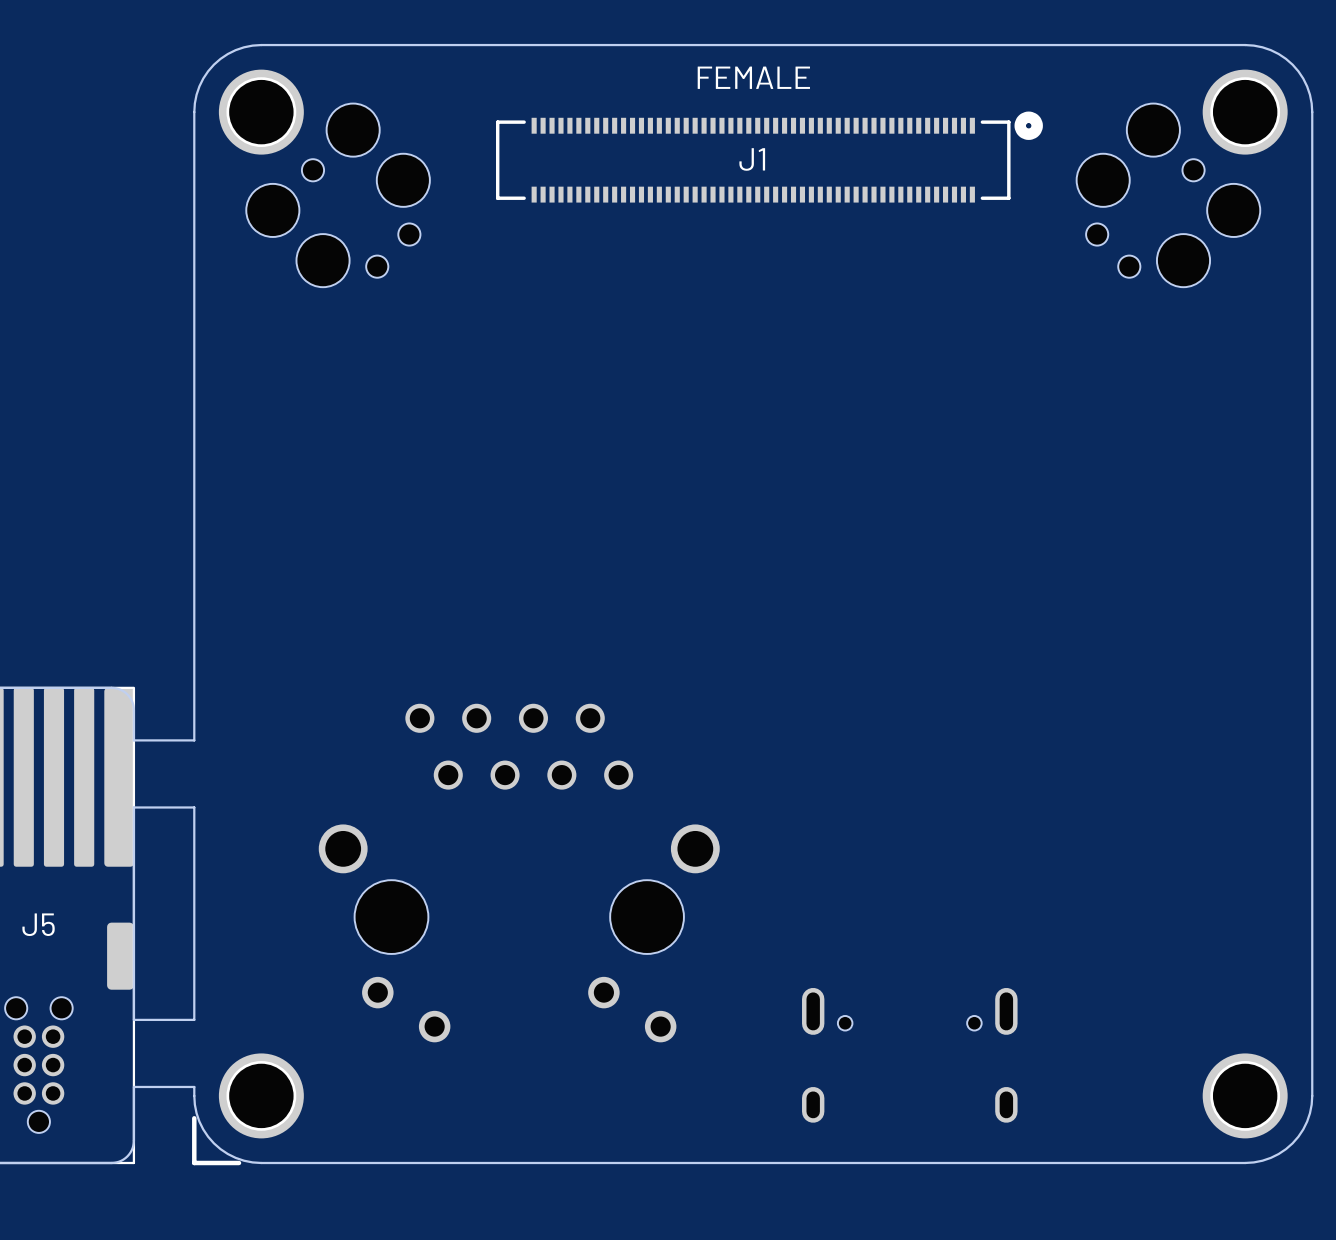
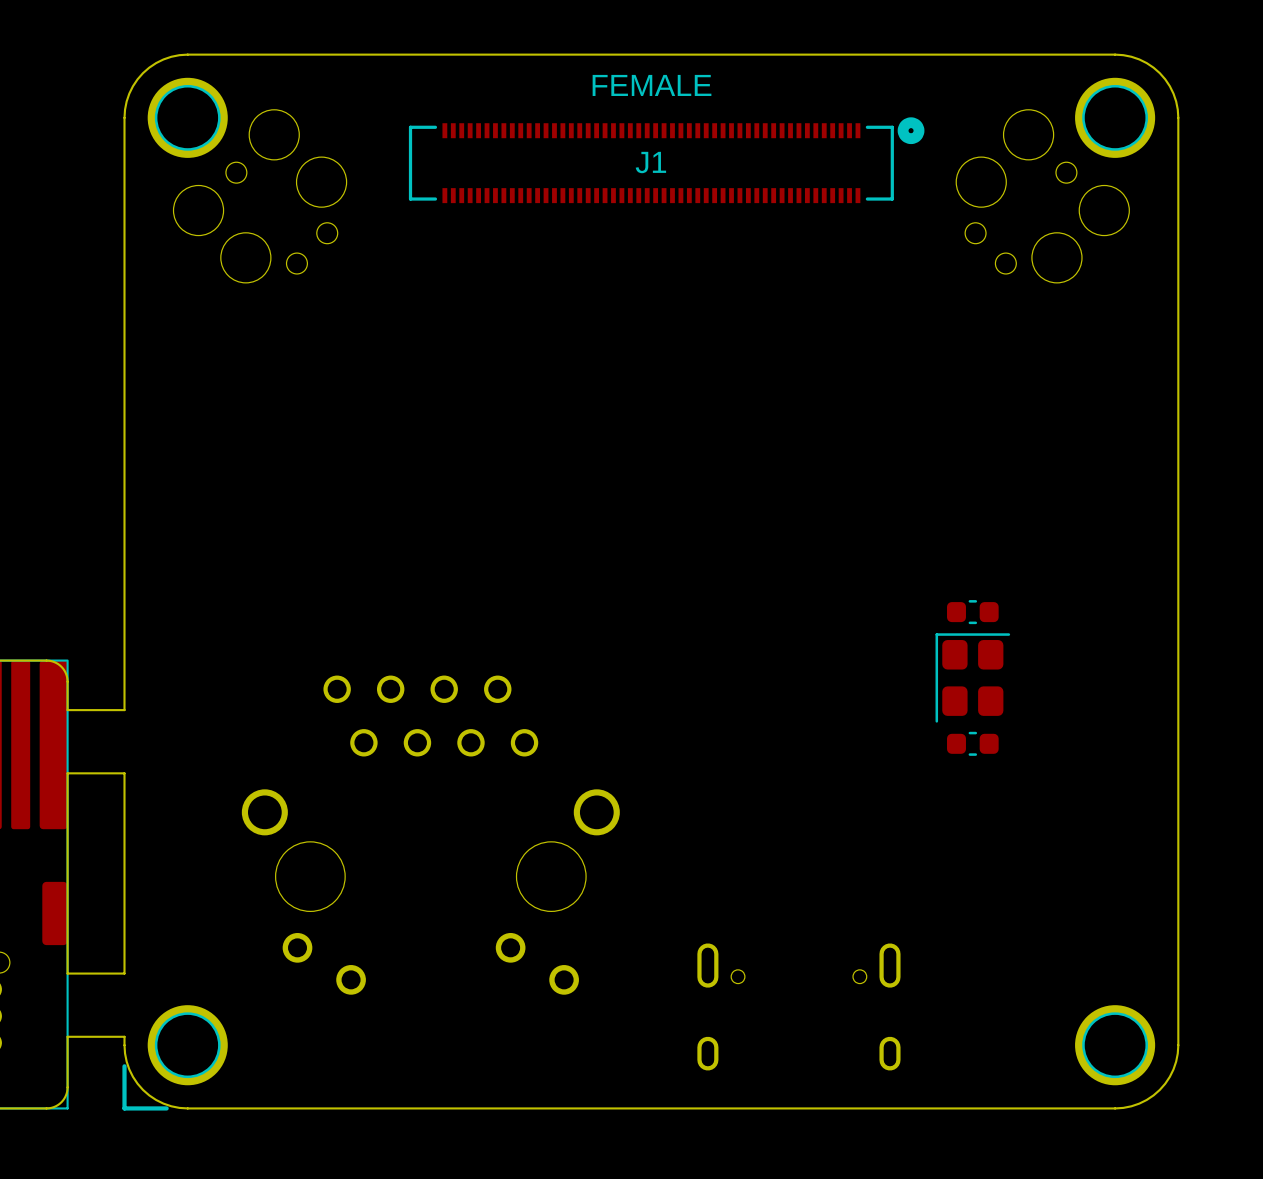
part: none -> (972, 612)
part: none -> (972, 677)
part: none -> (972, 743)

